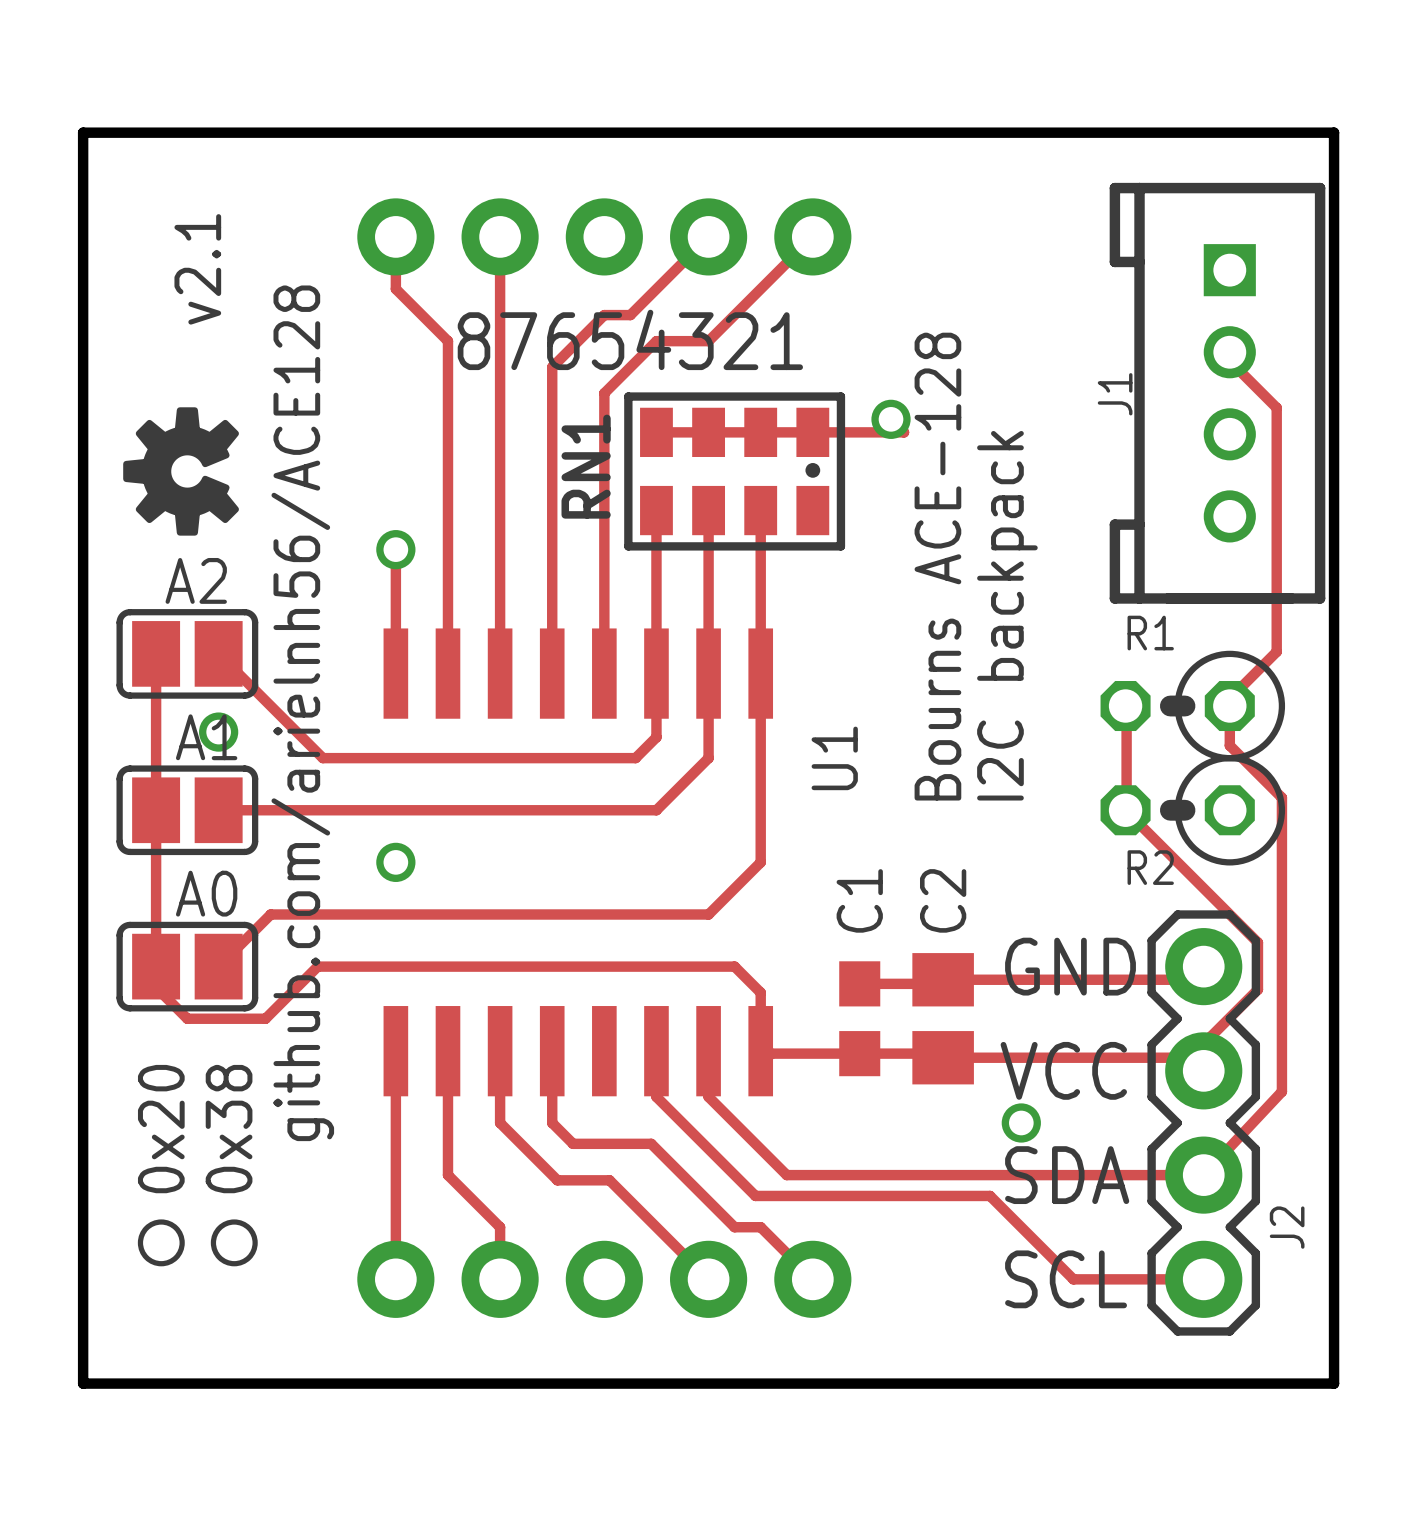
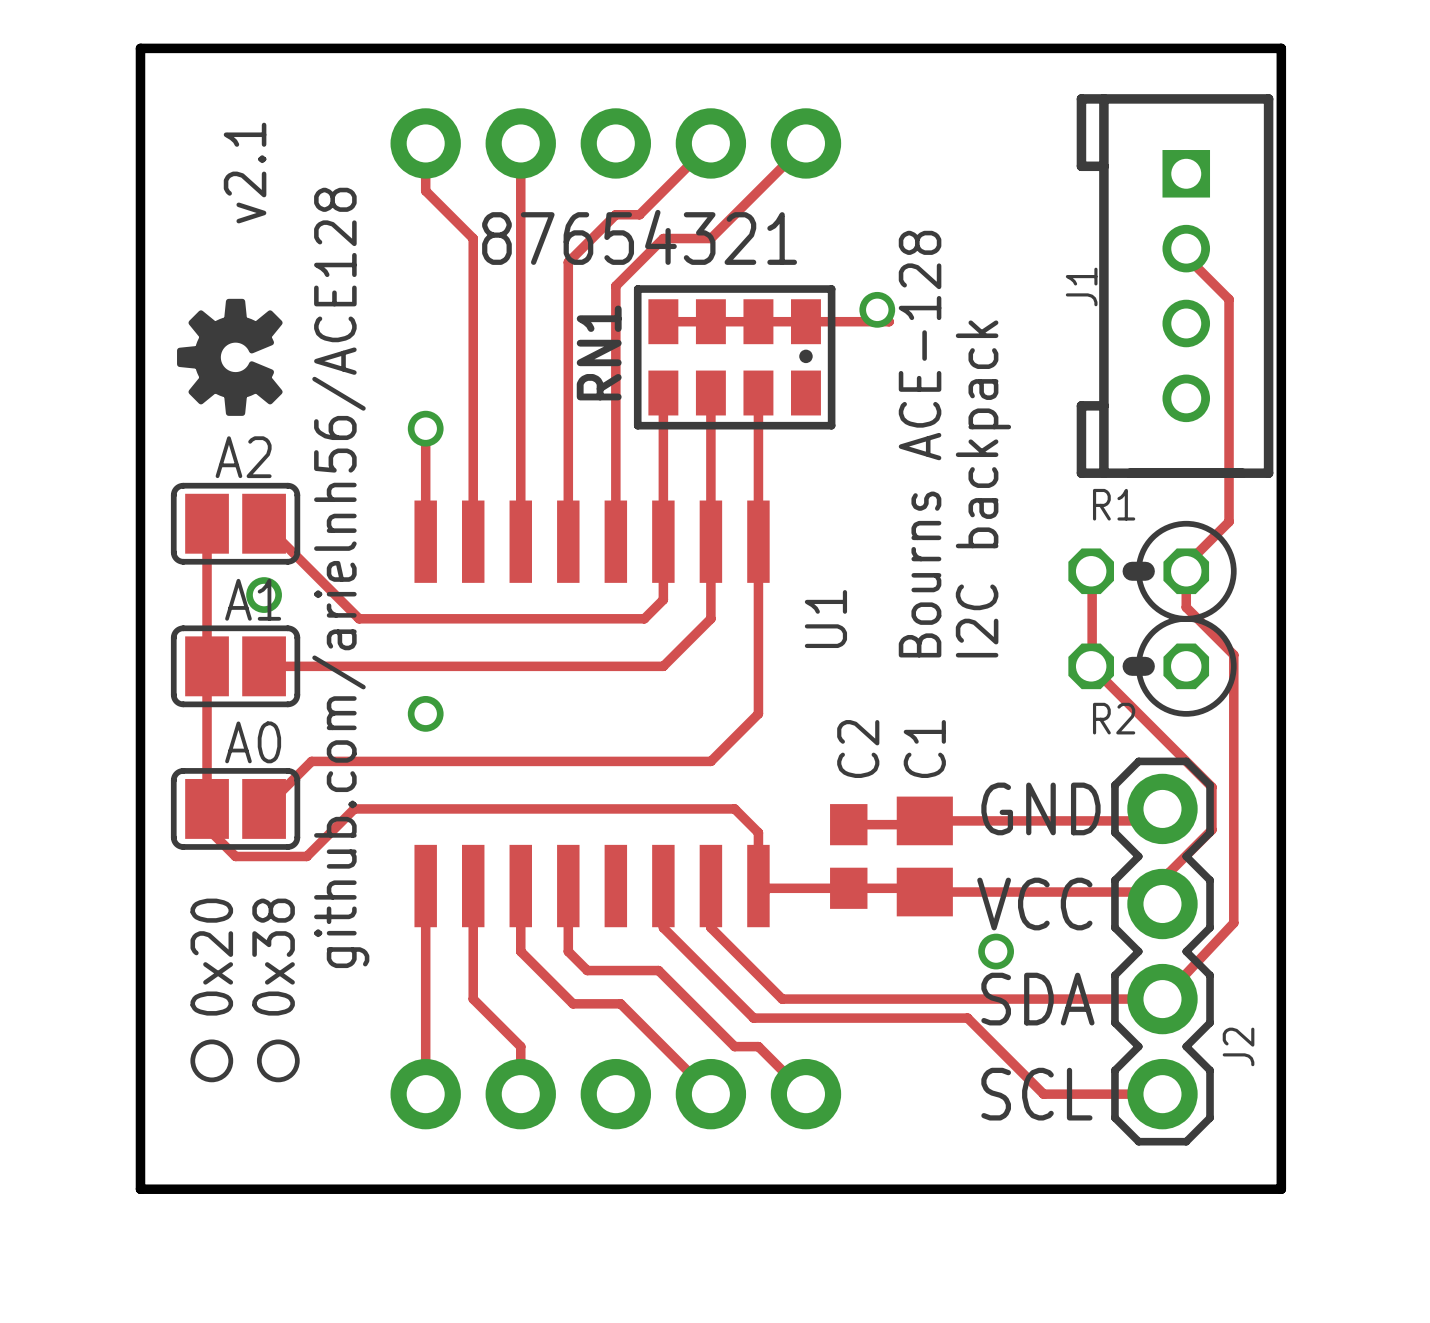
C1 name position: C1 (859, 900) -> C1 (924, 749)
C2 name position: C2 (943, 900) -> C2 (858, 749)

